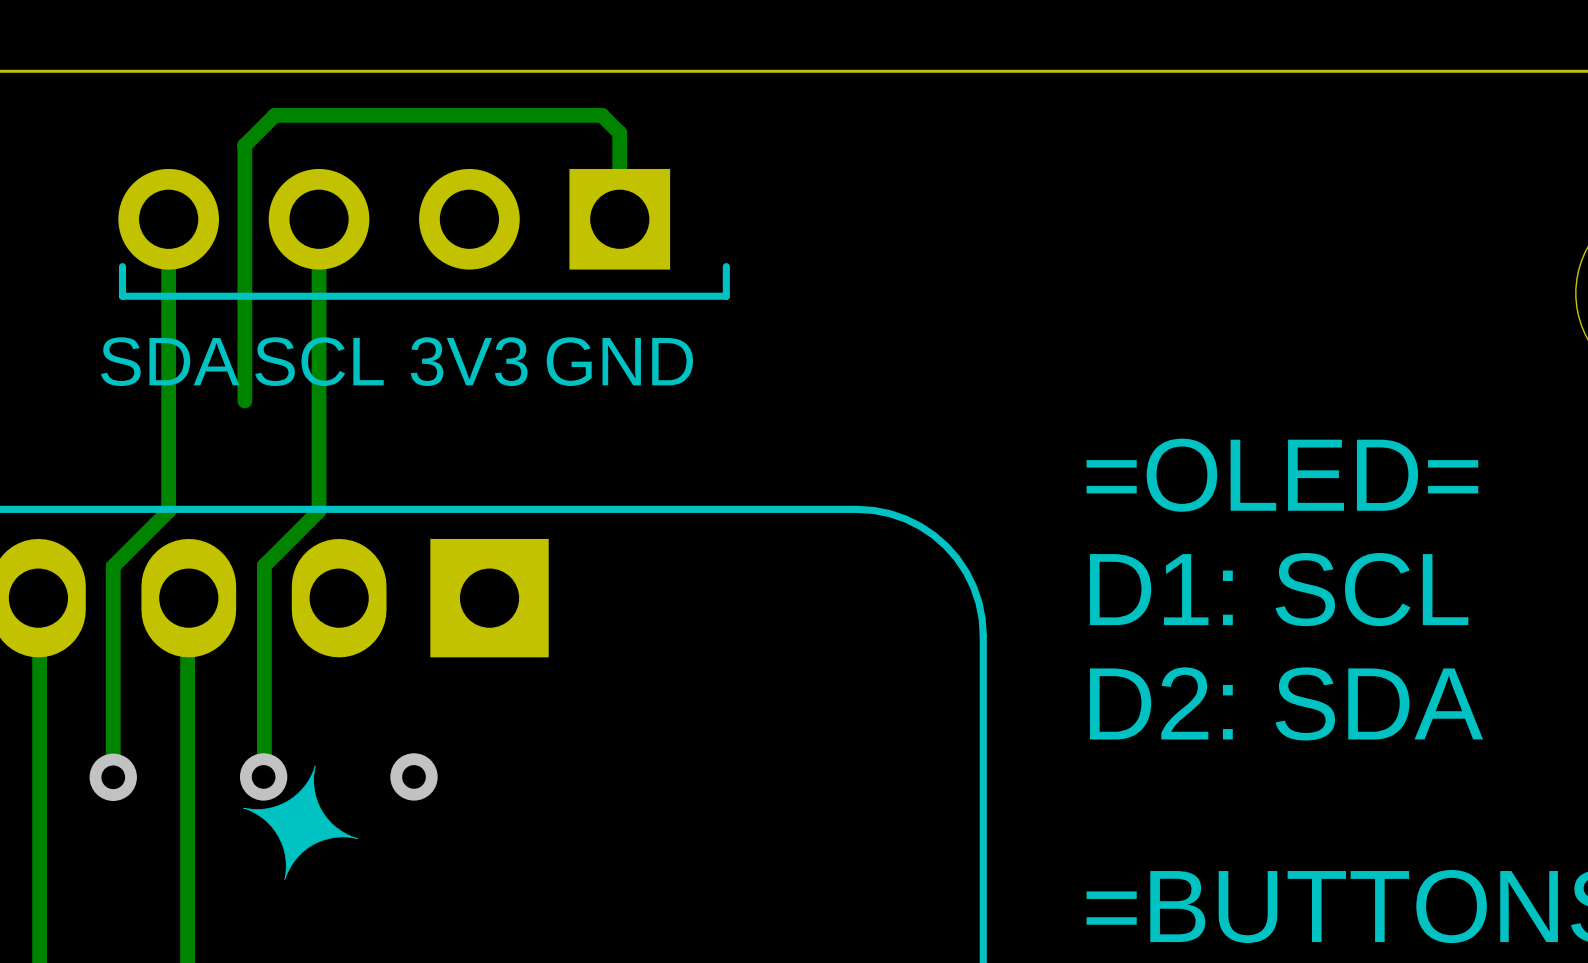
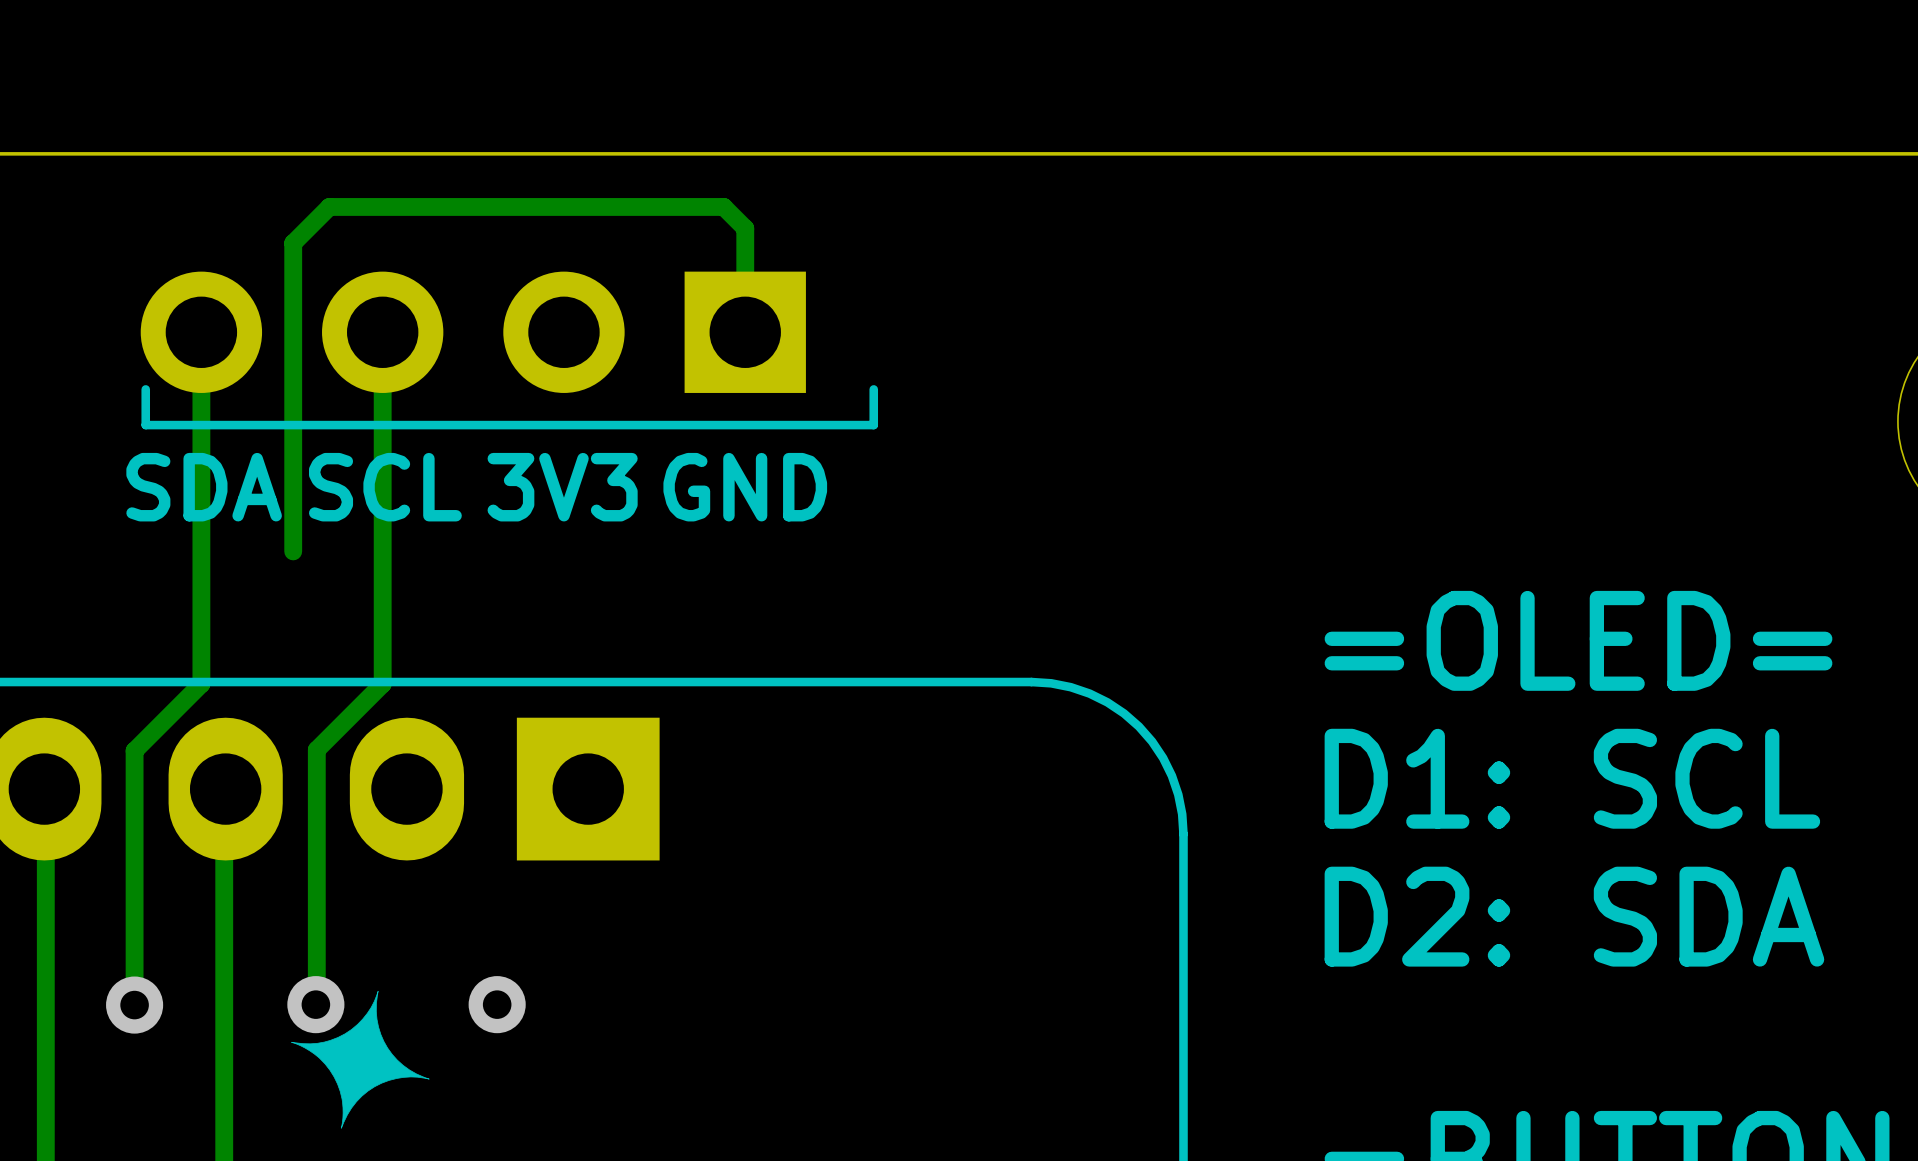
text position: SDA (170, 361) -> SDA (204, 487)
text position: SCL (319, 361) -> SCL (385, 487)
text position: 3V3 (469, 361) -> 3V3 (562, 487)
text position: GND (619, 361) -> GND (745, 487)

